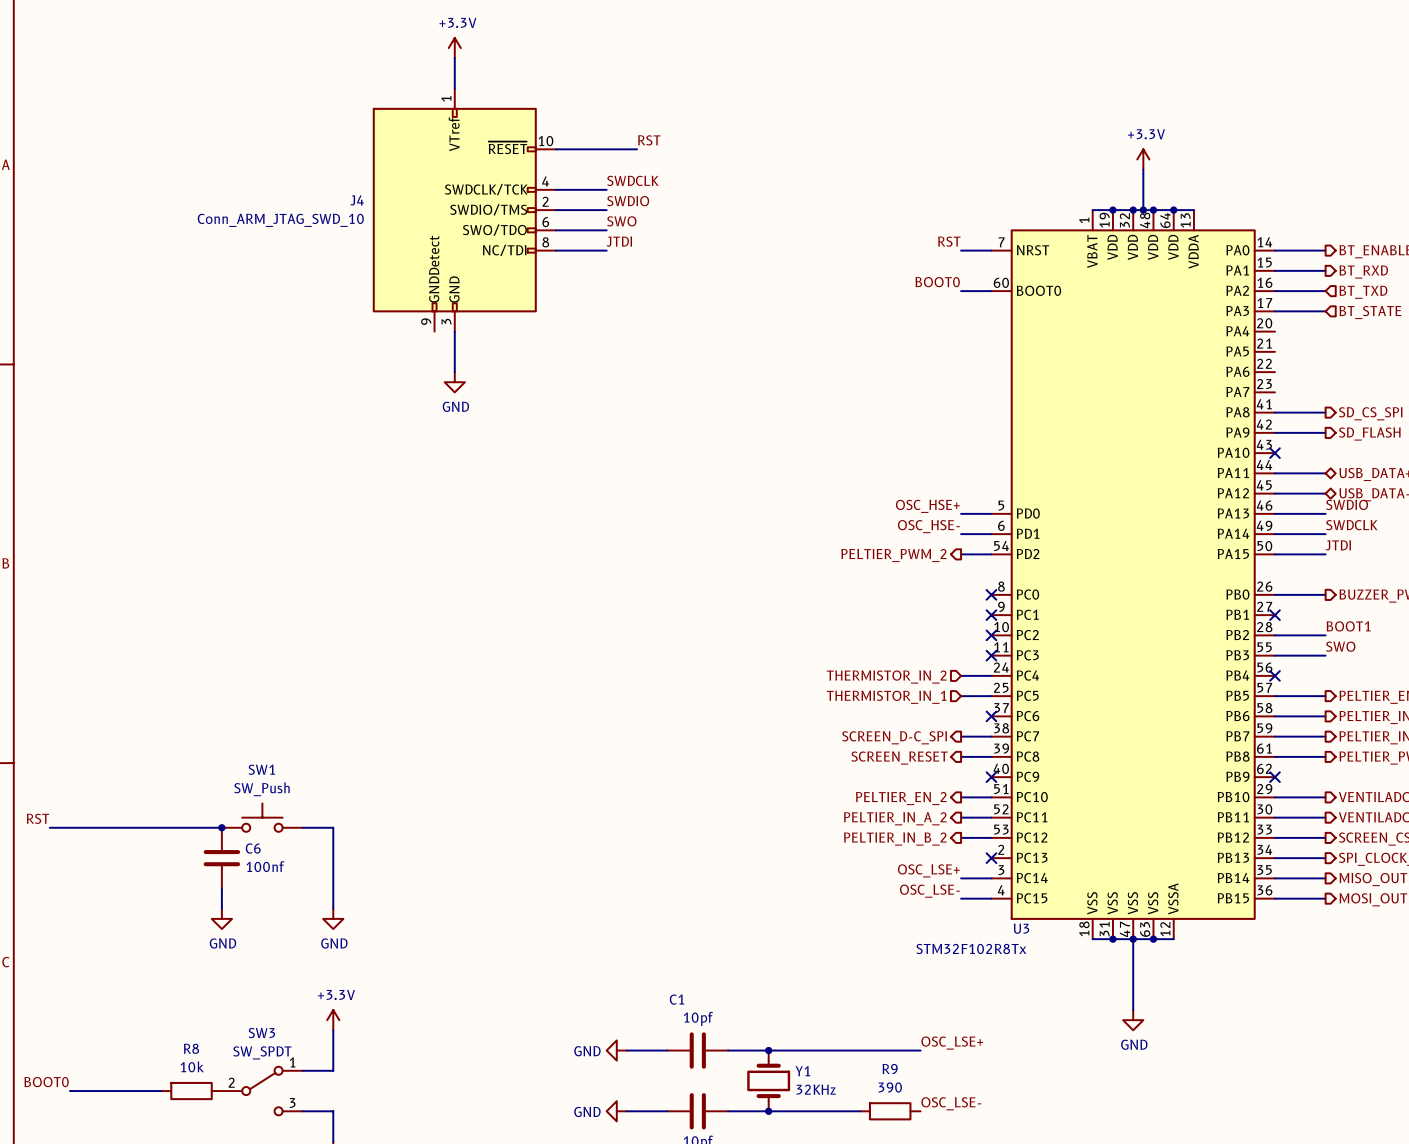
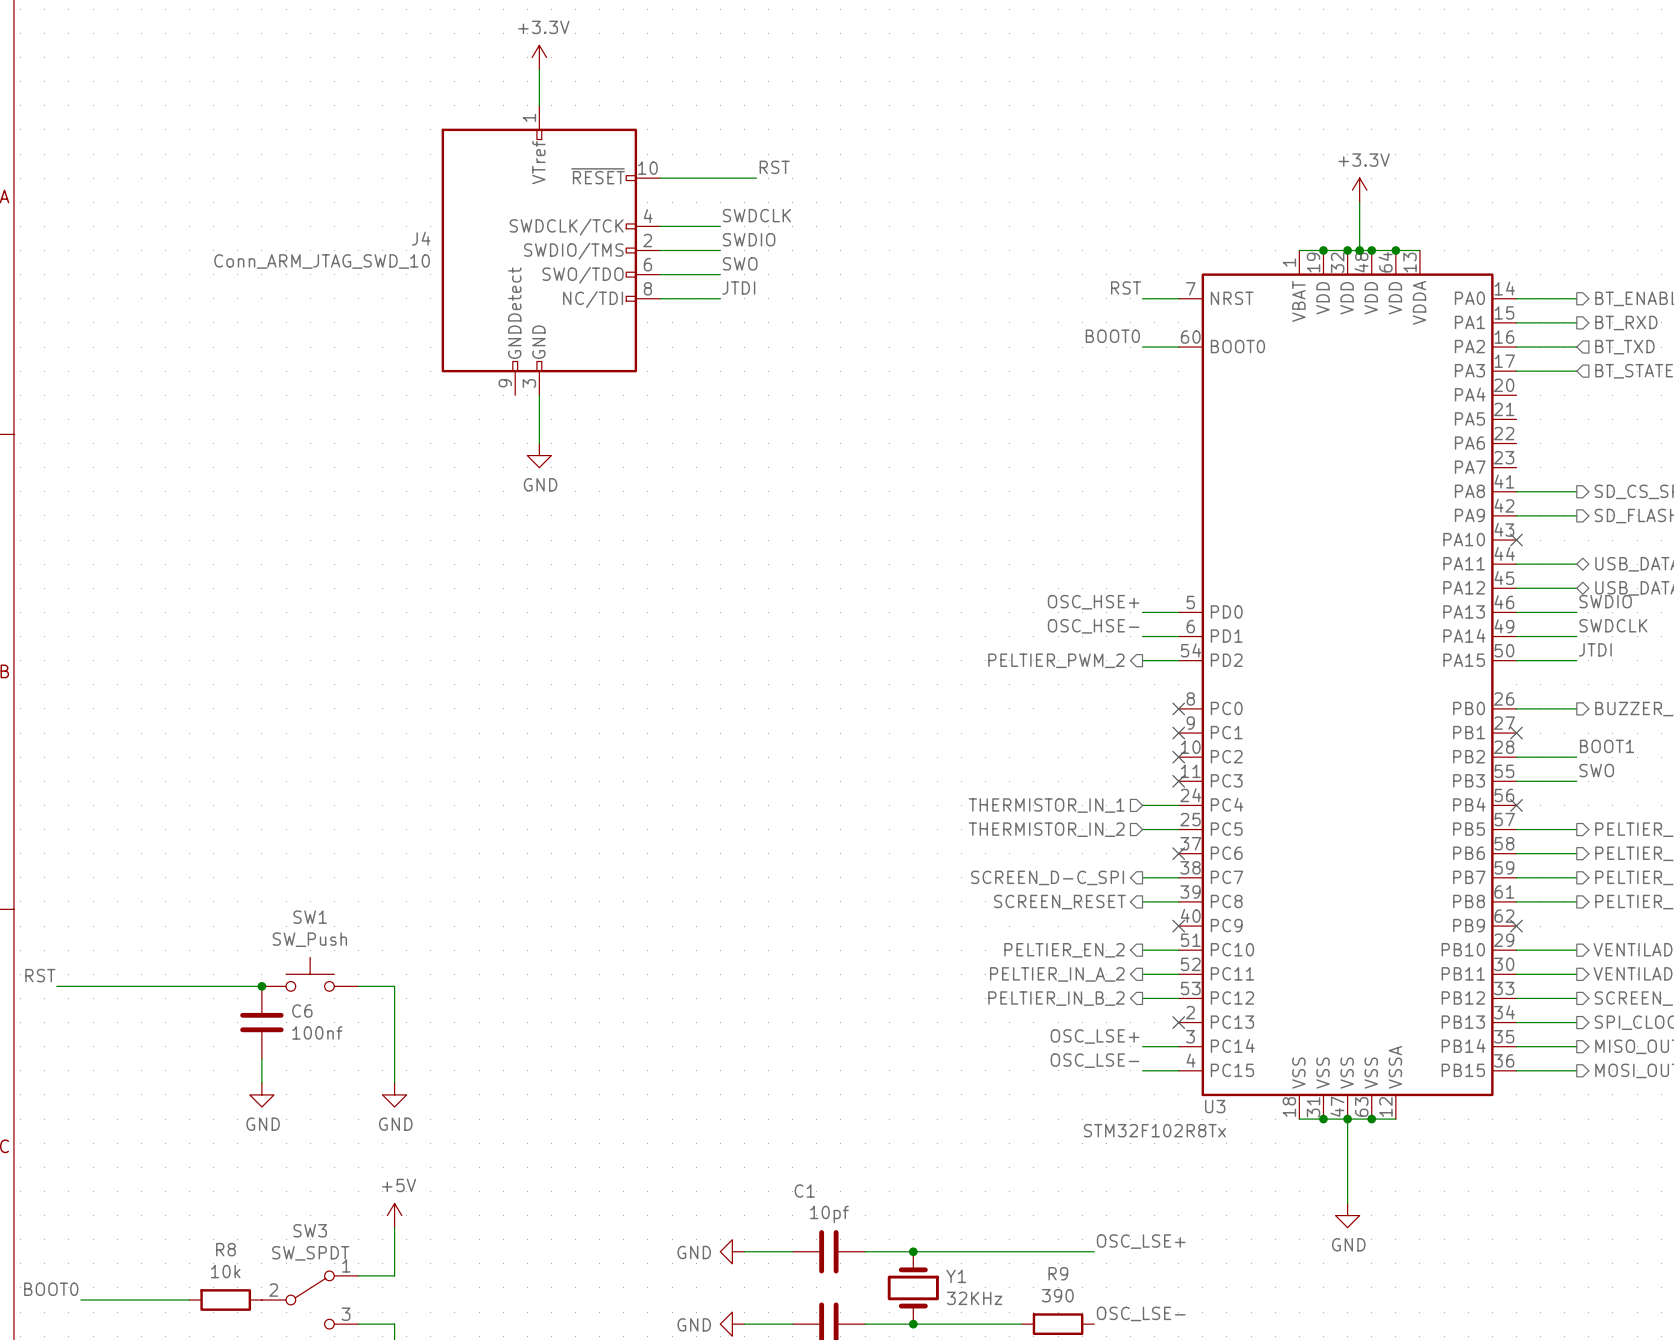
hierarchical label: THERMISTOR_IN_2 (886, 677) -> THERMISTOR_IN_1 (1046, 805)
hierarchical label: THERMISTOR_IN_1 (886, 697) -> THERMISTOR_IN_2 (1046, 829)
power symbol: +3.3V (333, 1020) -> +5V (394, 1215)

